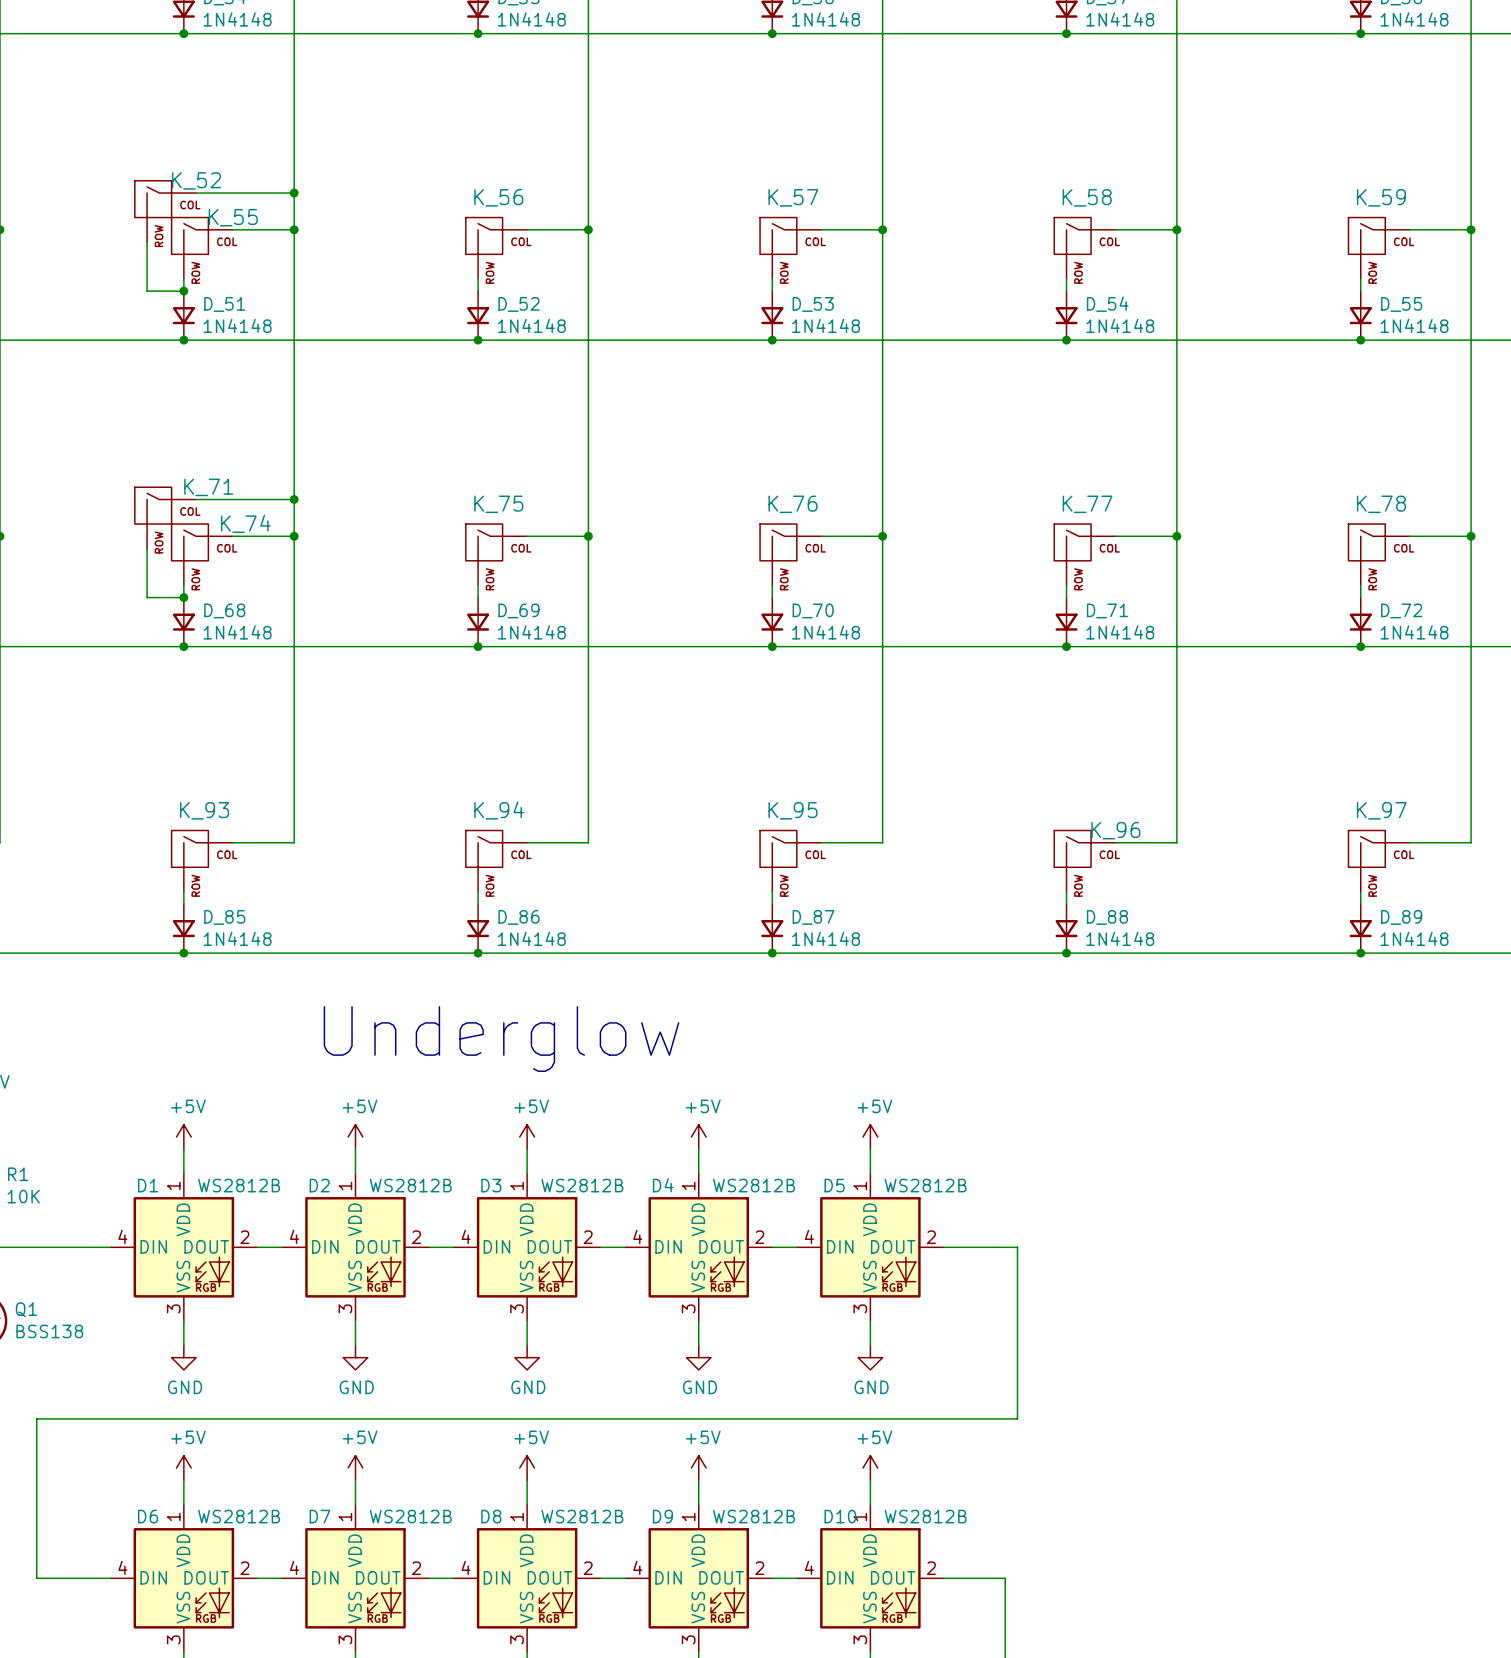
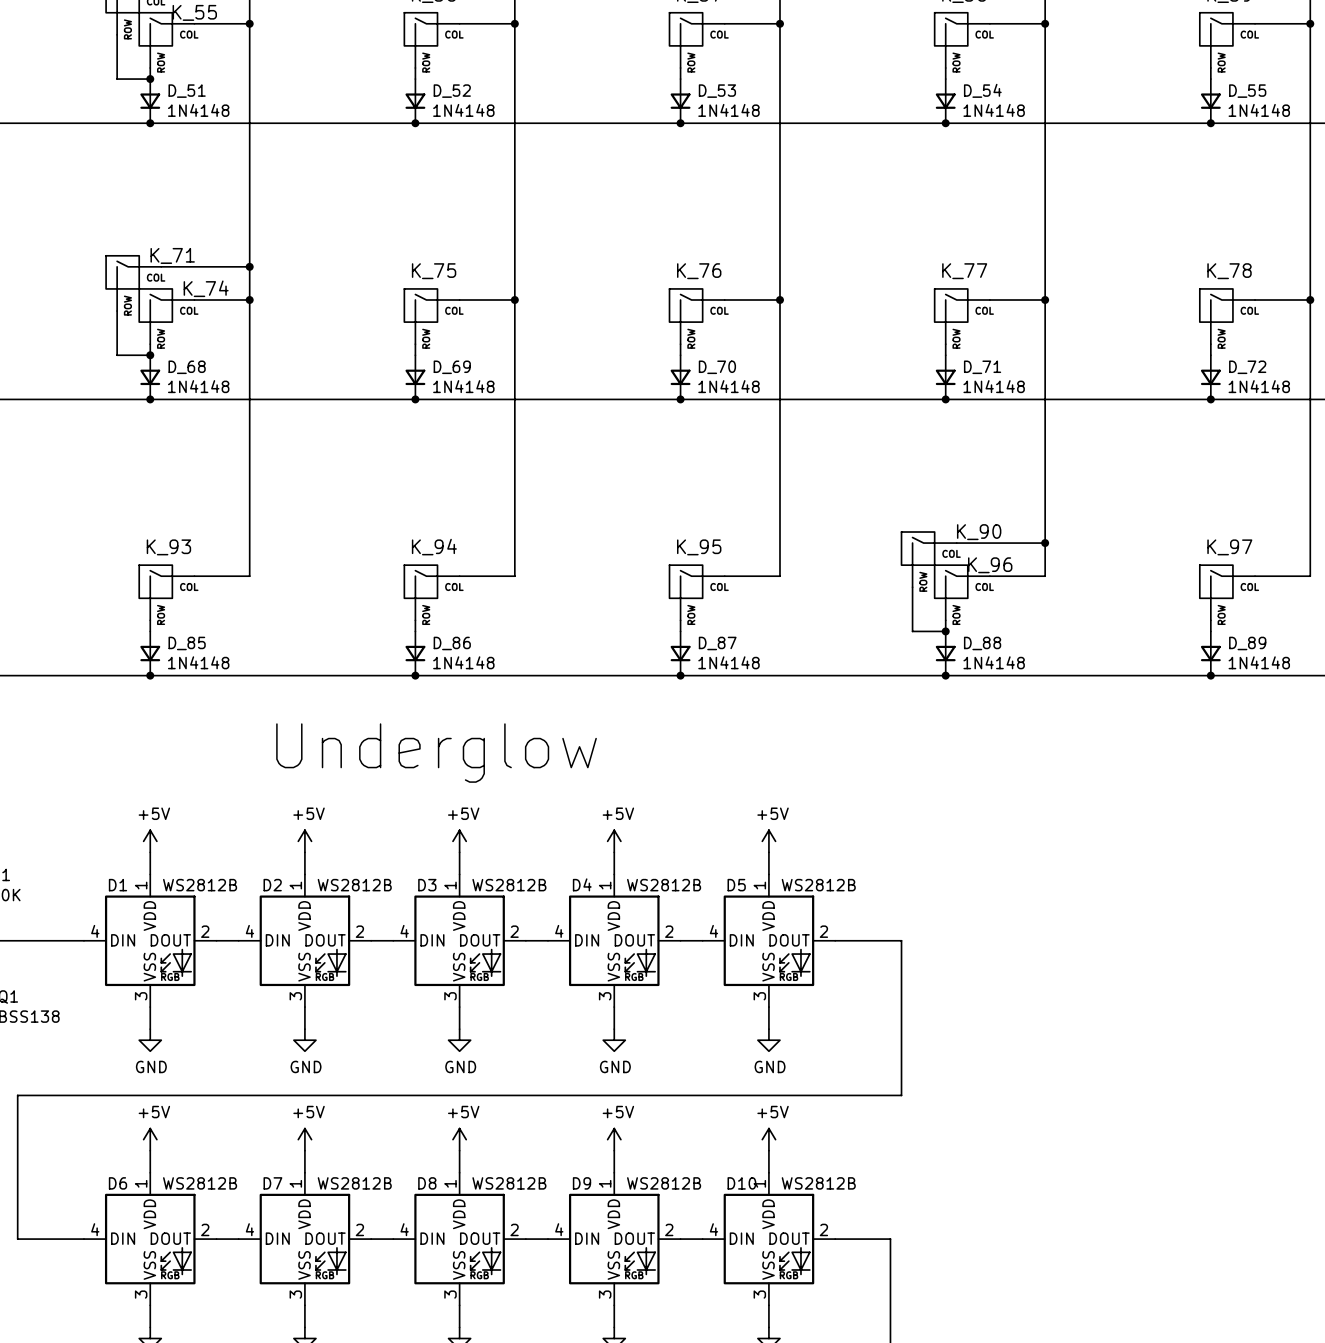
wire: none -> (956, 543) (1045, 543)
junction: none -> (1045, 543)
K_90: none -> (929, 559)
wire: none -> (912, 587) (912, 631) (945, 631)
junction: none -> (945, 631)

